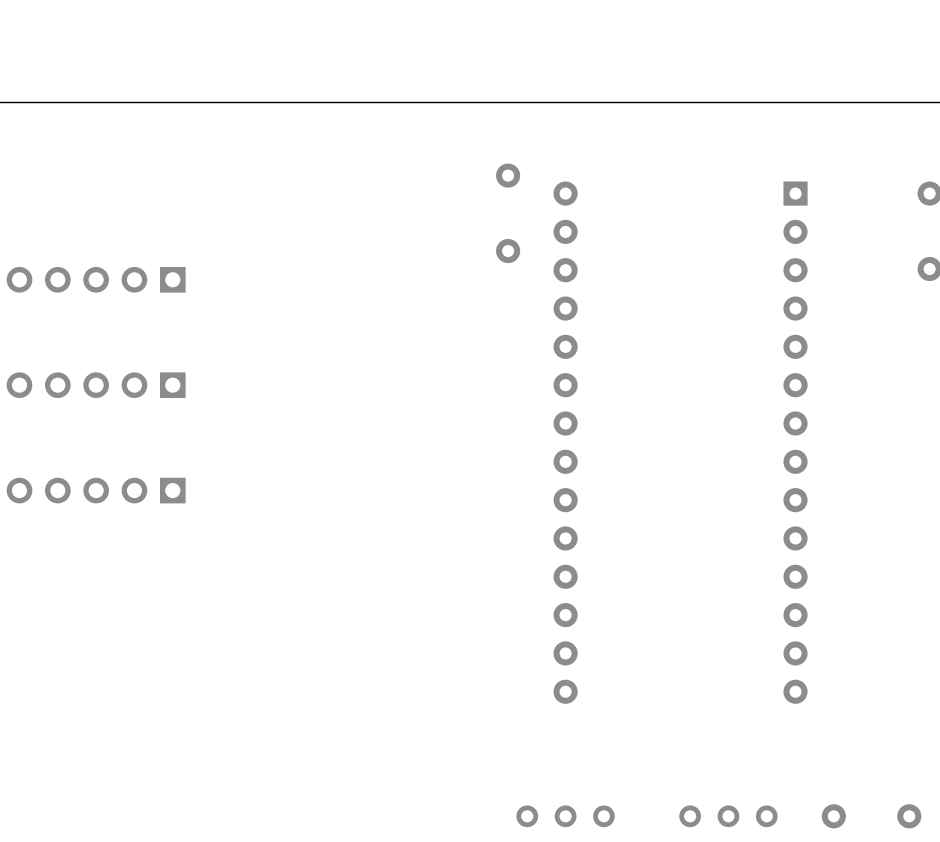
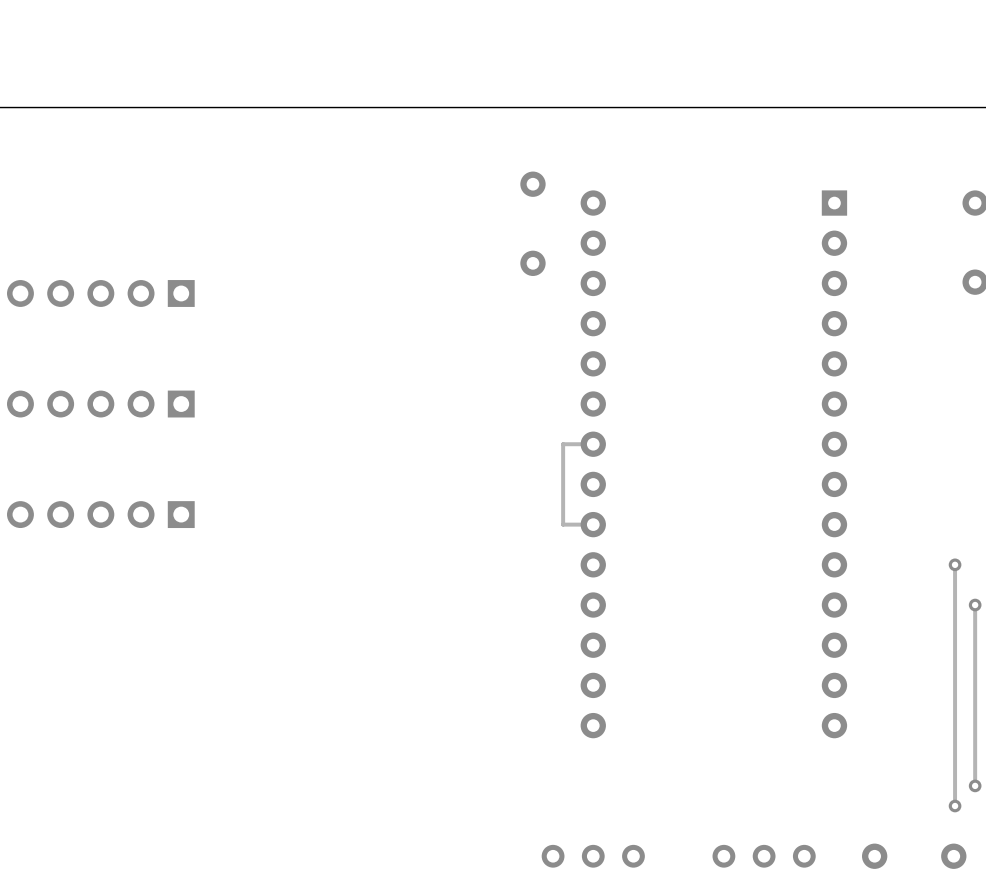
track: none -> (593, 444) (563, 444) (563, 524) (593, 524)
track: none -> (955, 564) (955, 806)
via: none -> (955, 564)
track: none -> (975, 605) (975, 785)
via: none -> (975, 605)
via: none -> (975, 785)
via: none -> (955, 806)

